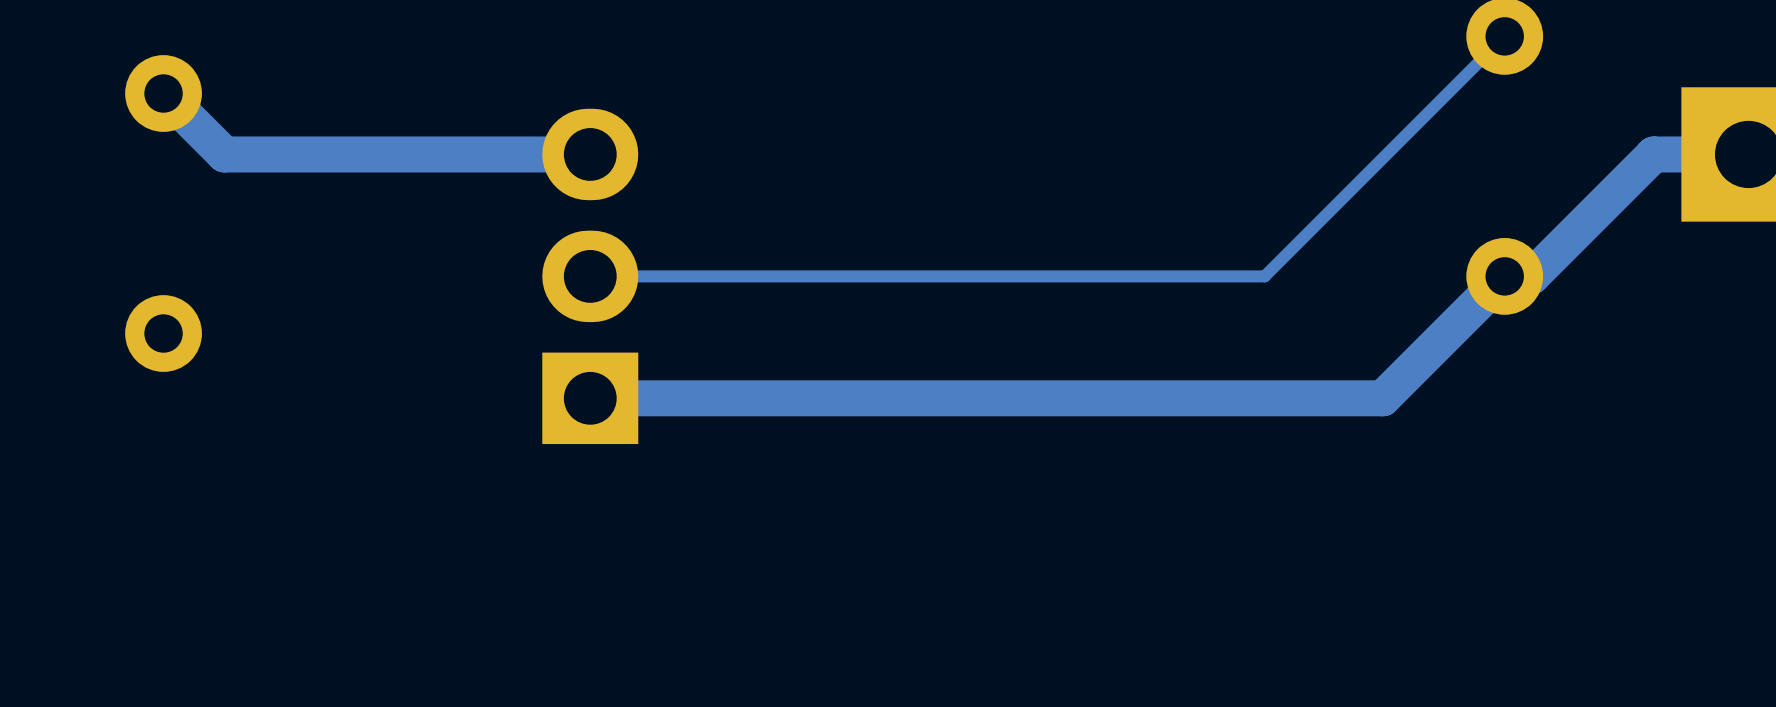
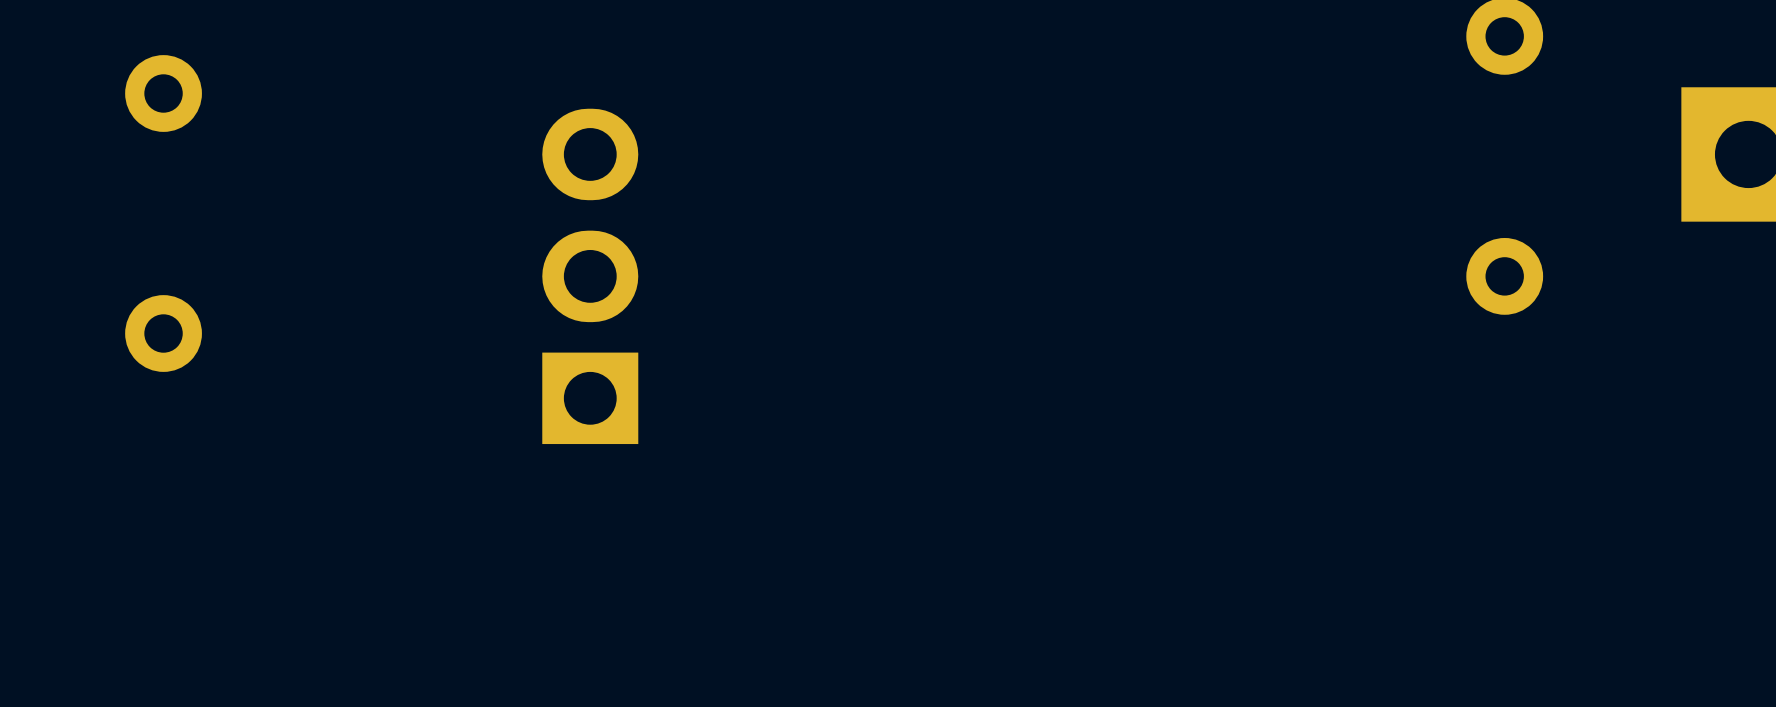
track: (1504, 36) (1264, 276) (590, 276) -> none
track: (163, 93) (224, 154) (590, 154) -> none
track: (1748, 154) (1653, 154) (1531, 276) (1504, 276) (1382, 398) (590, 398) -> none

